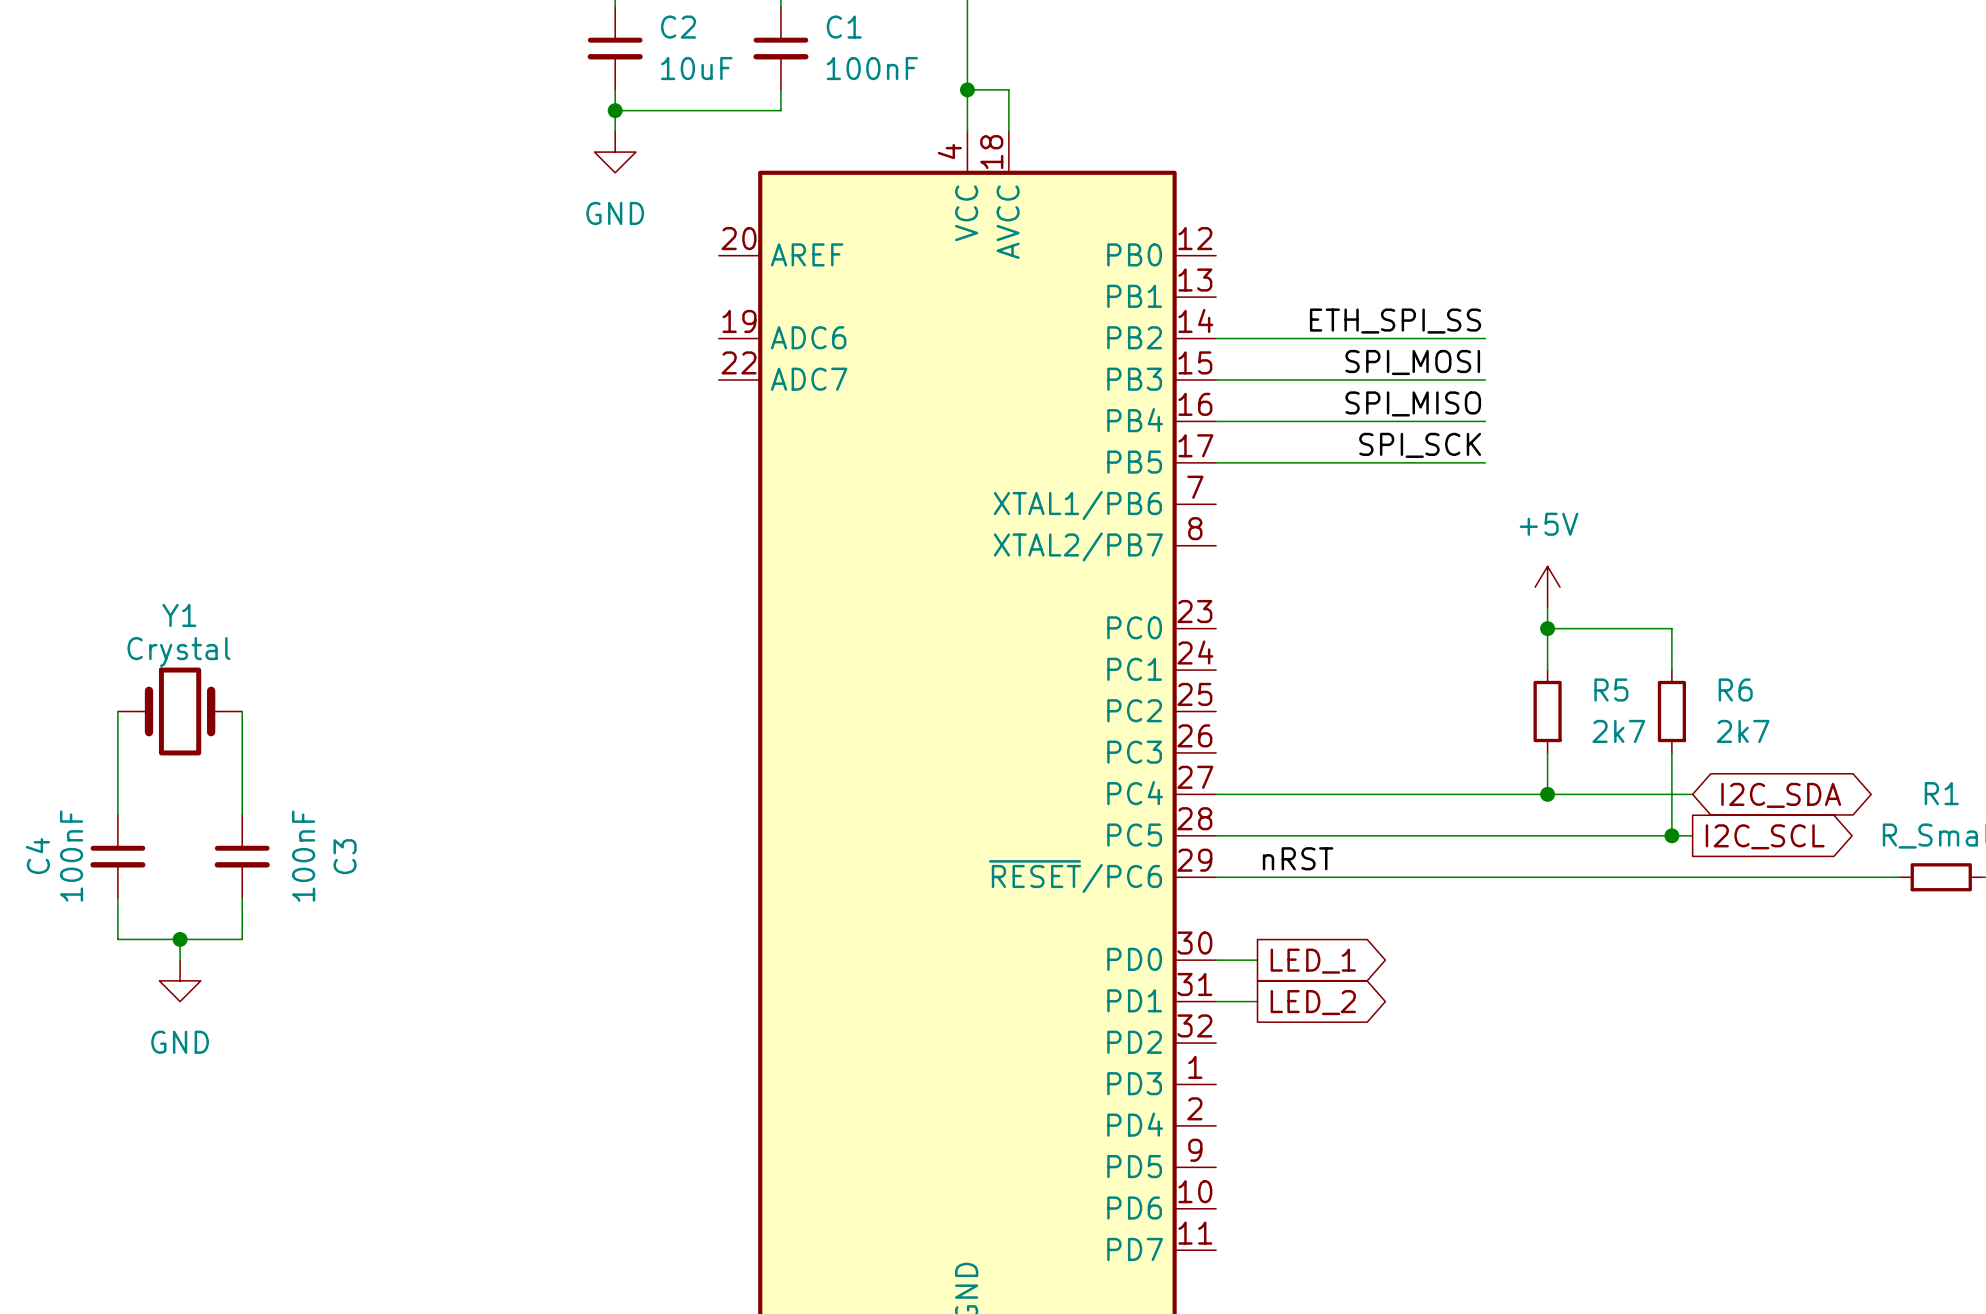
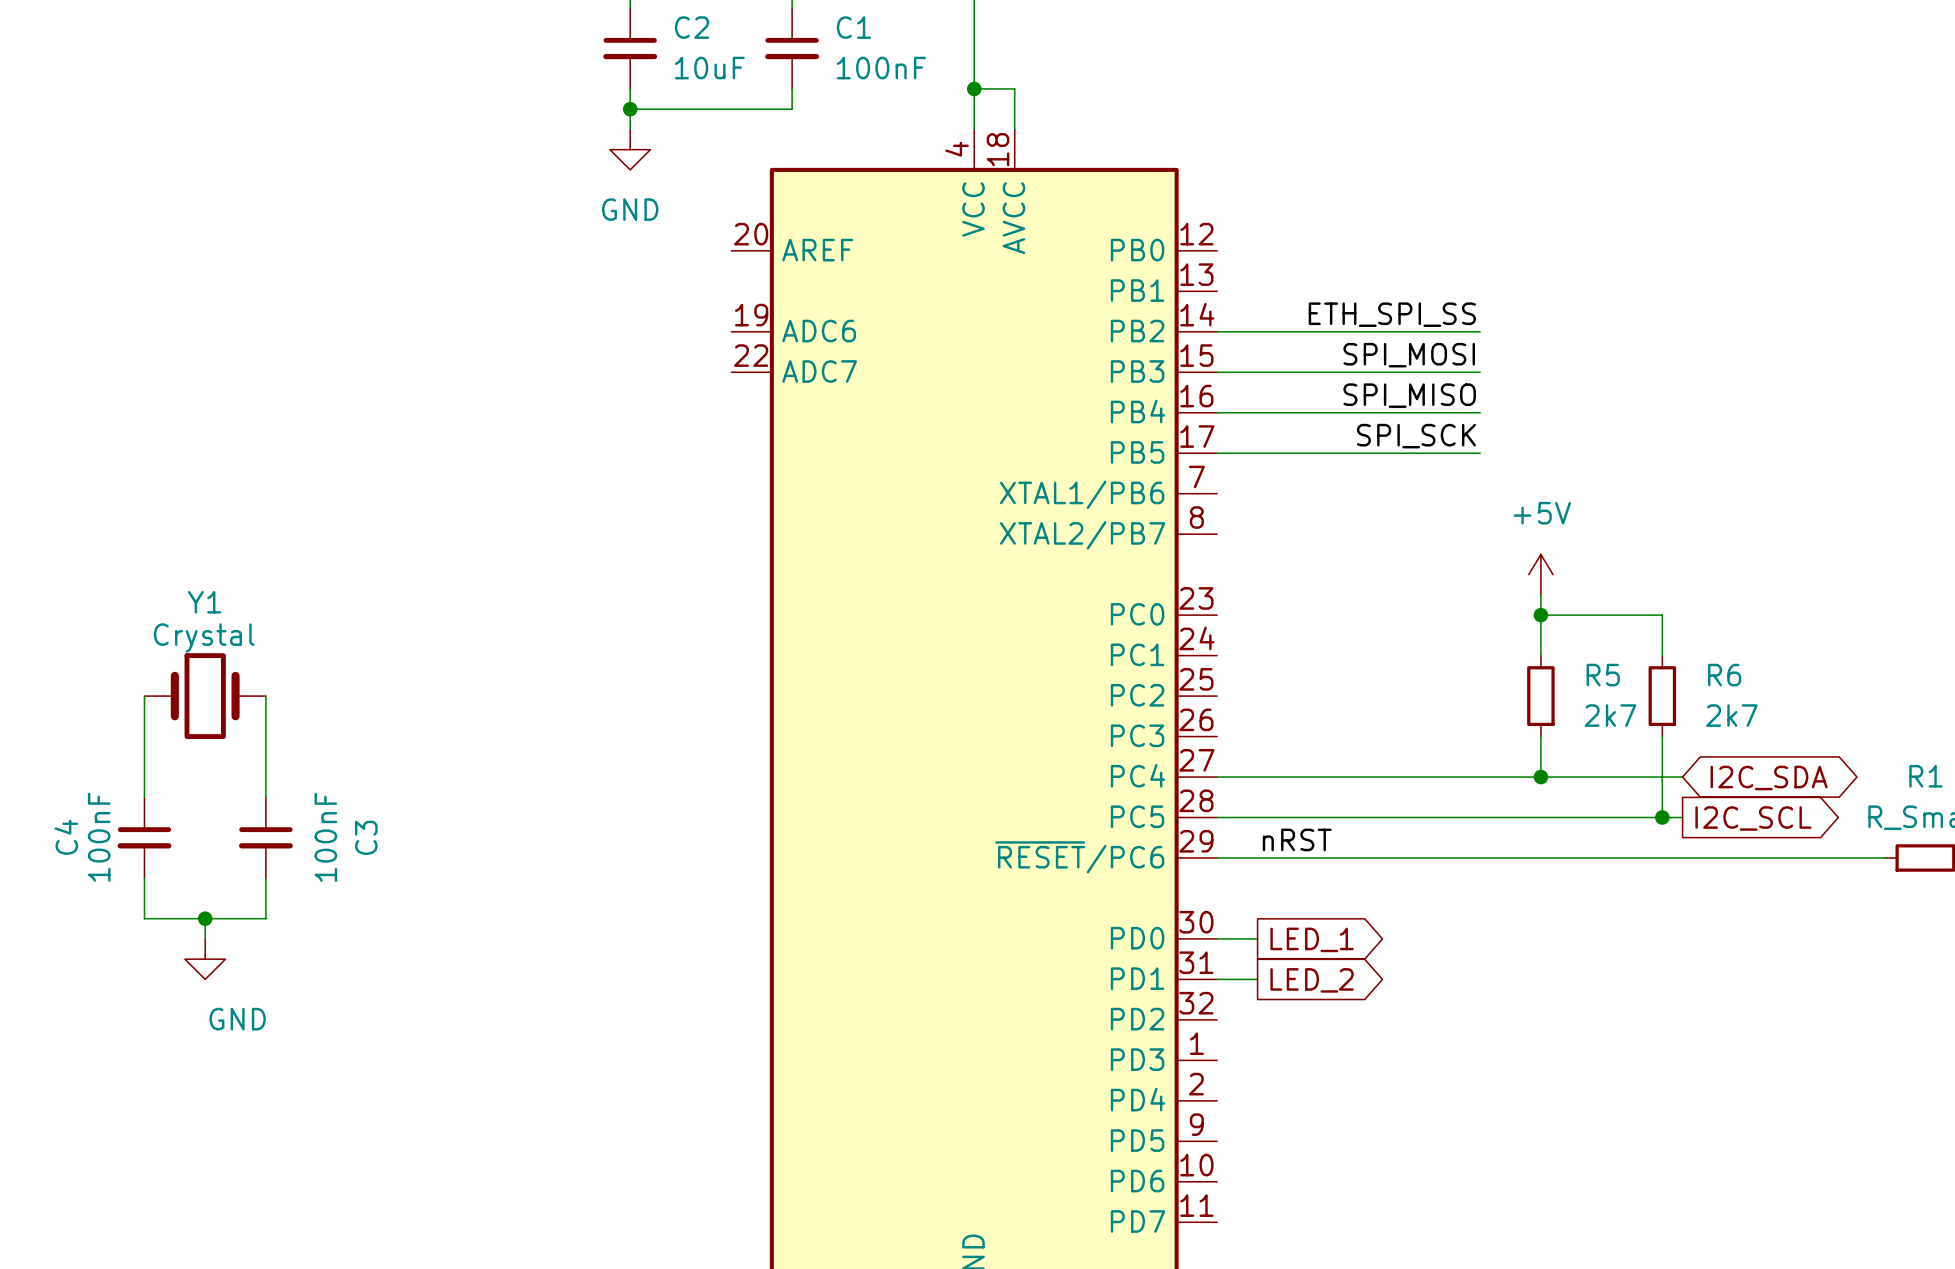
power symbol text position: GND (180, 1042) -> GND (237, 1019)

